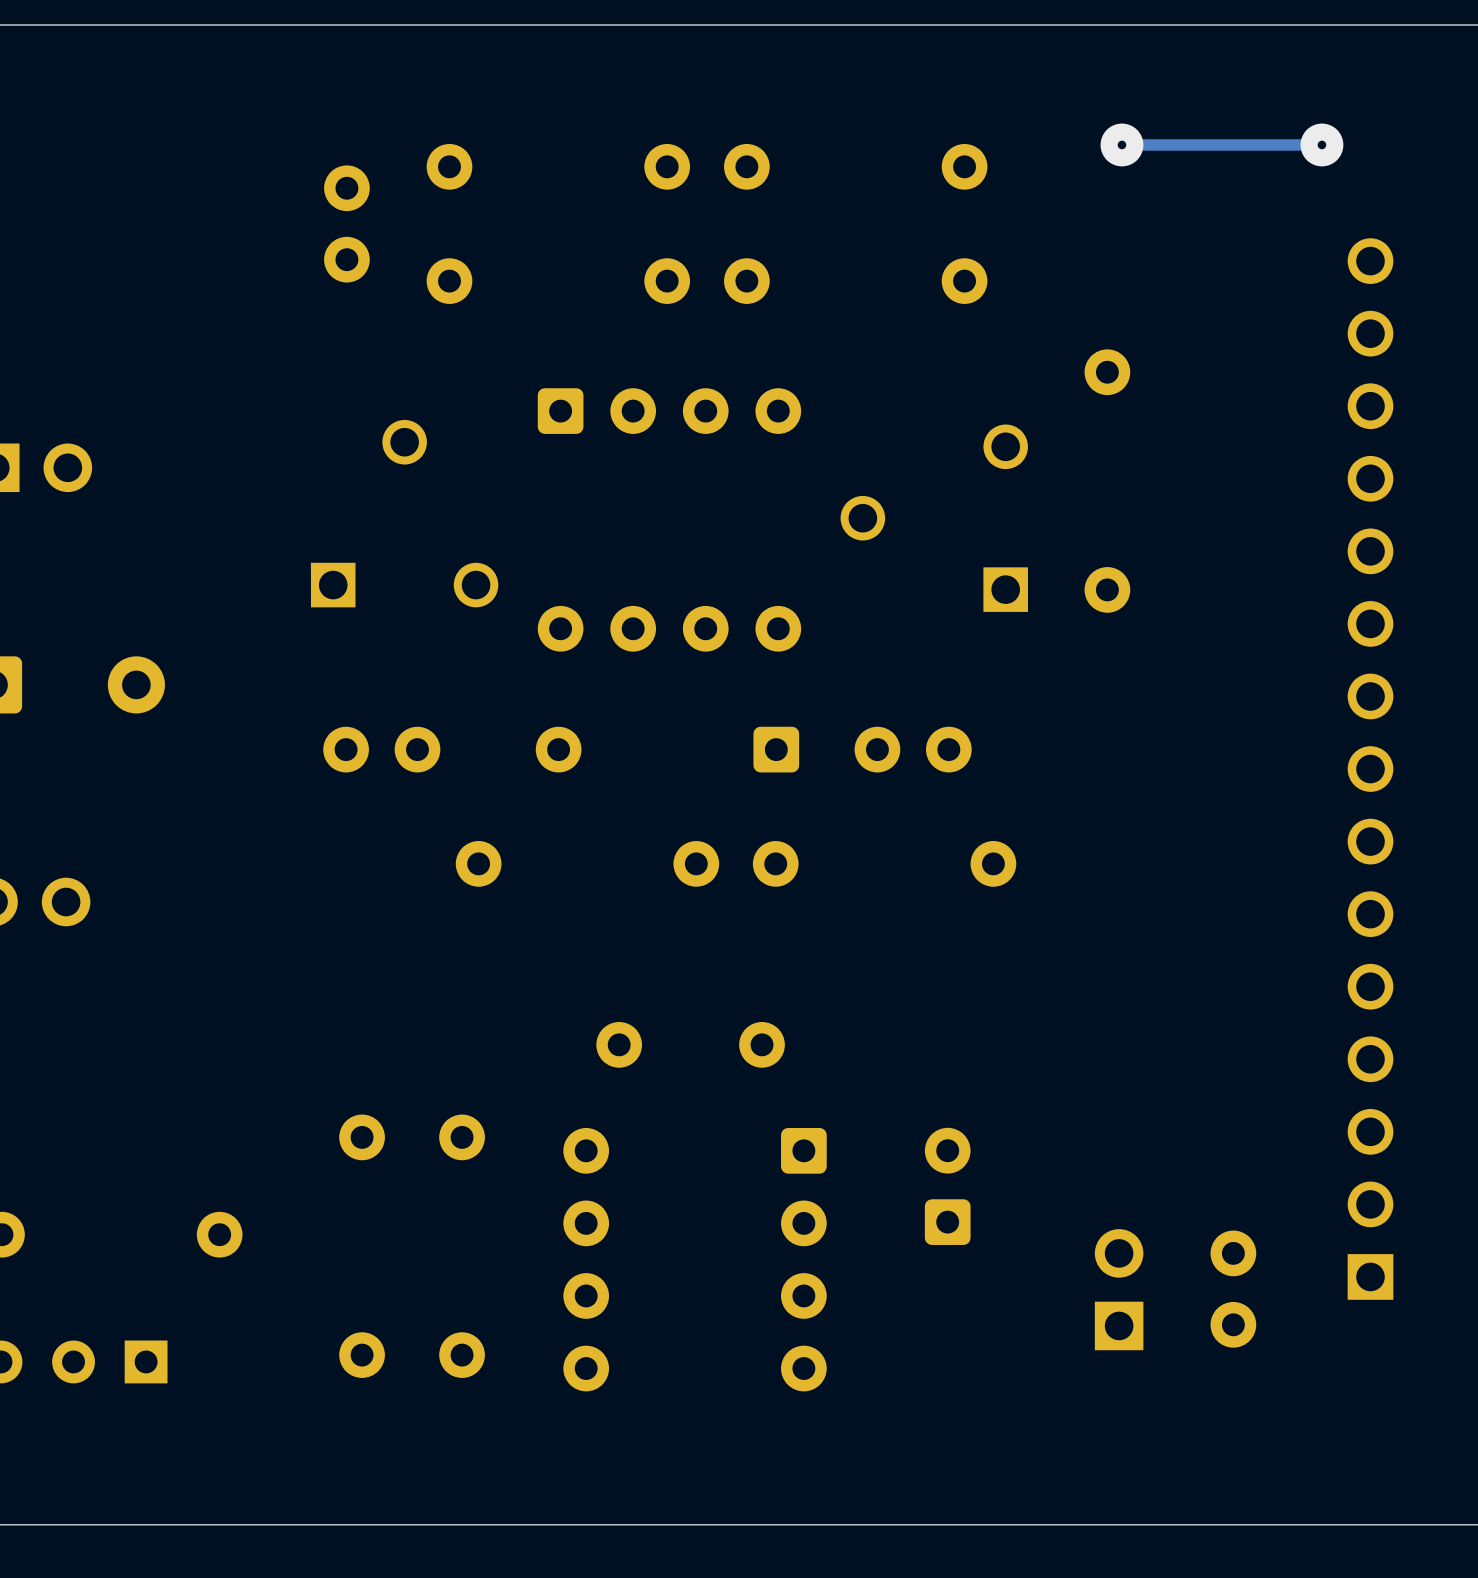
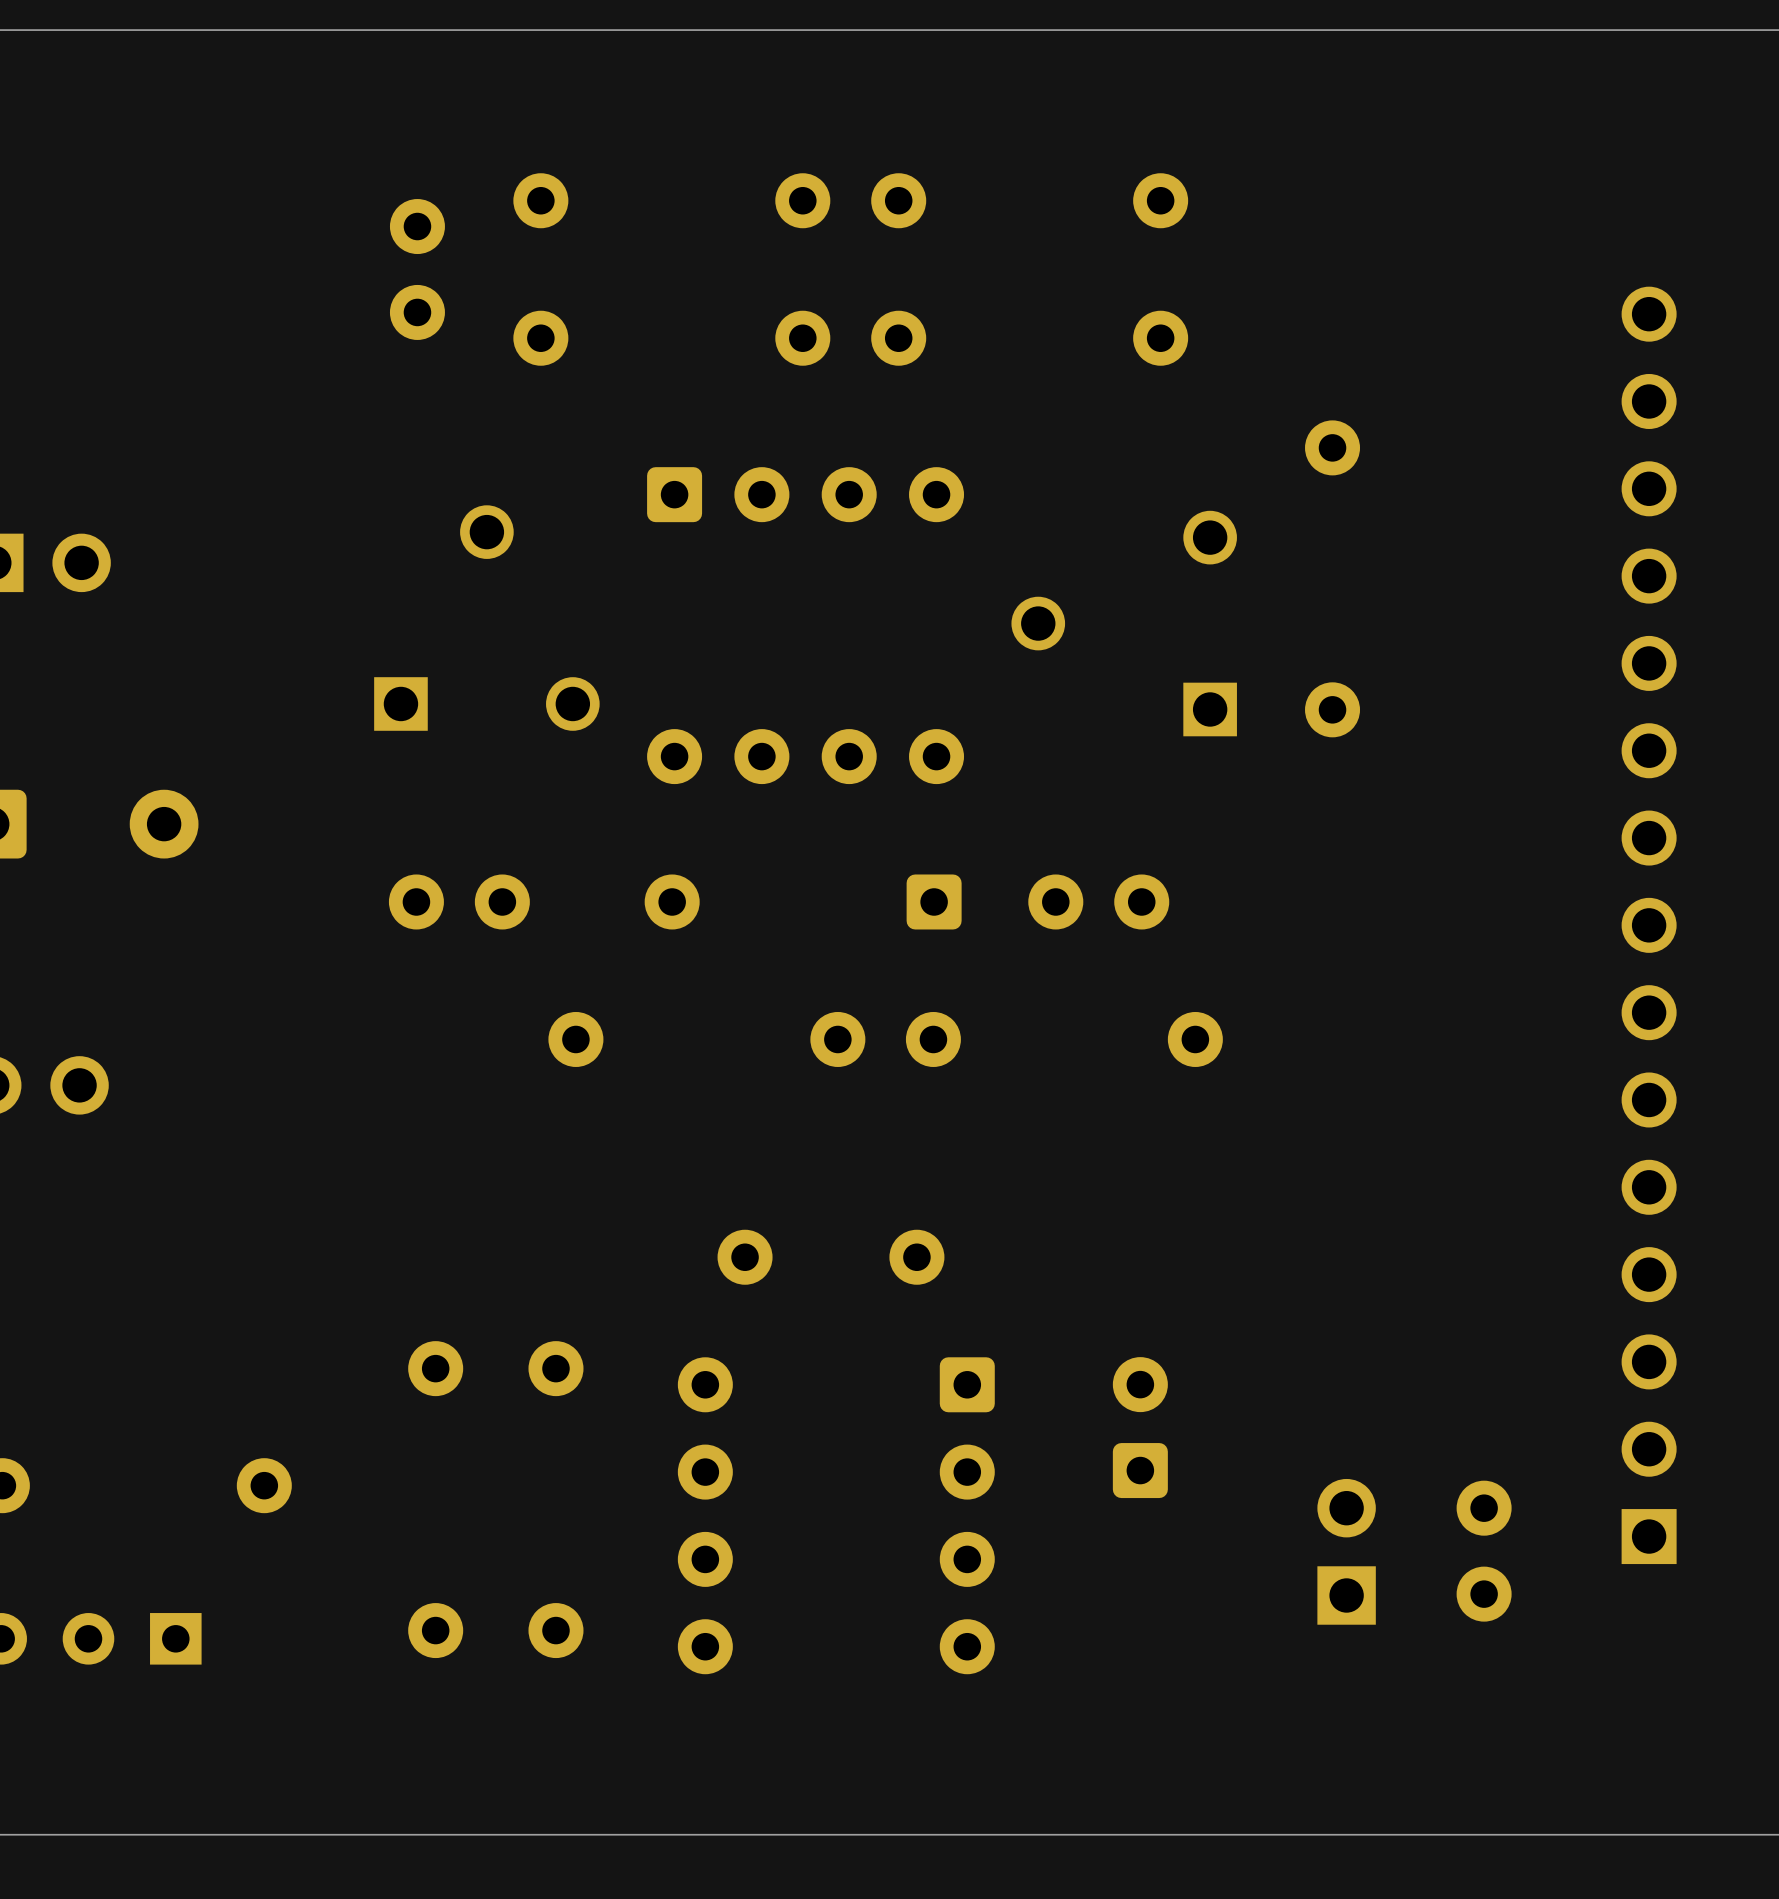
via: (1121, 144) -> none
track: (1321, 144) (1121, 144) -> none
via: (1321, 144) -> none

